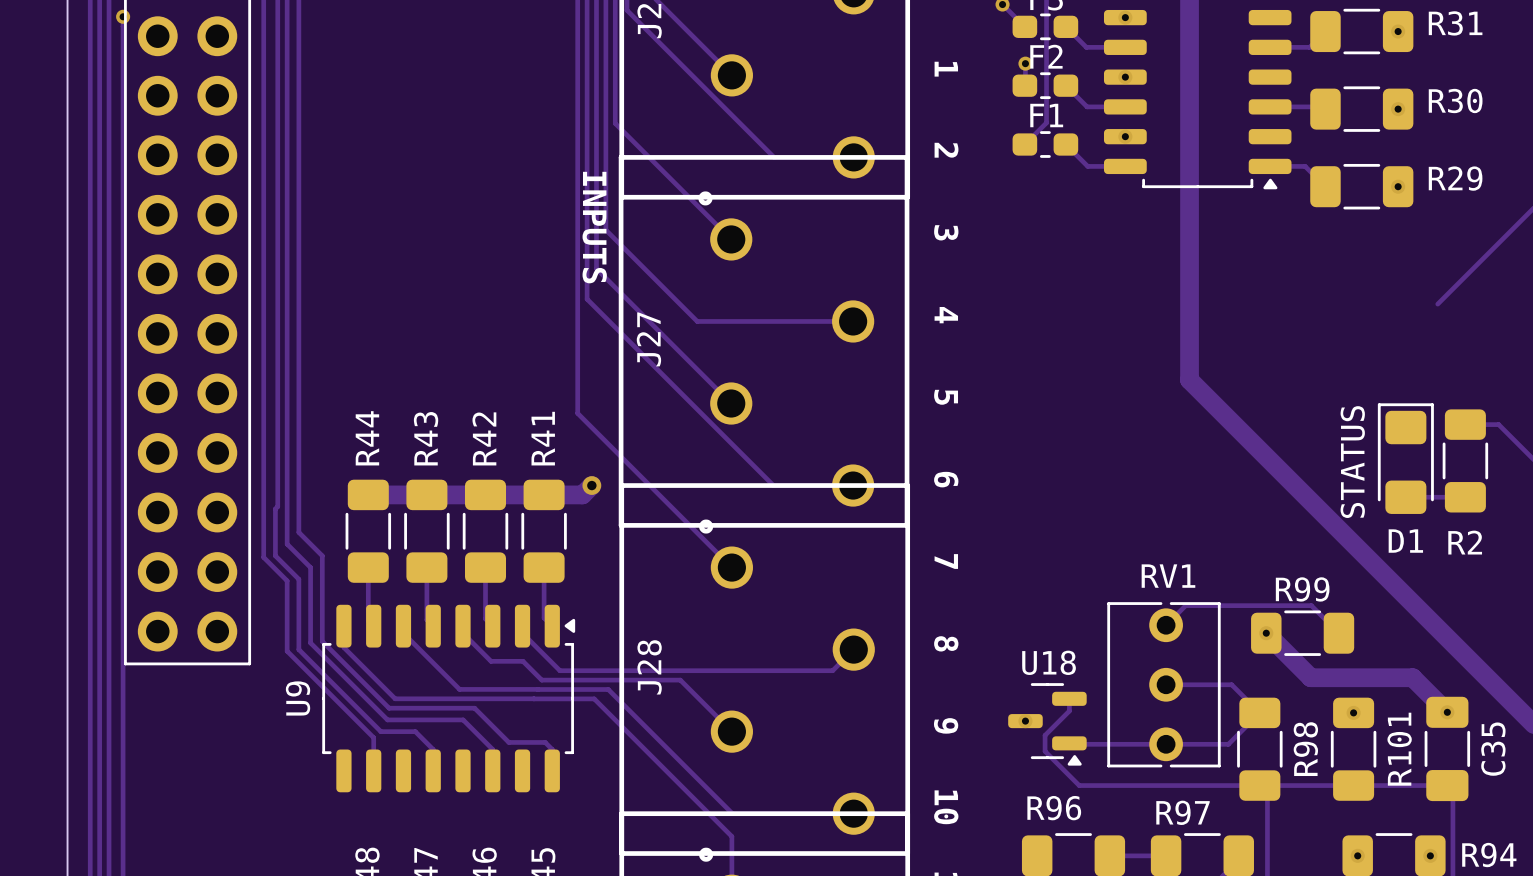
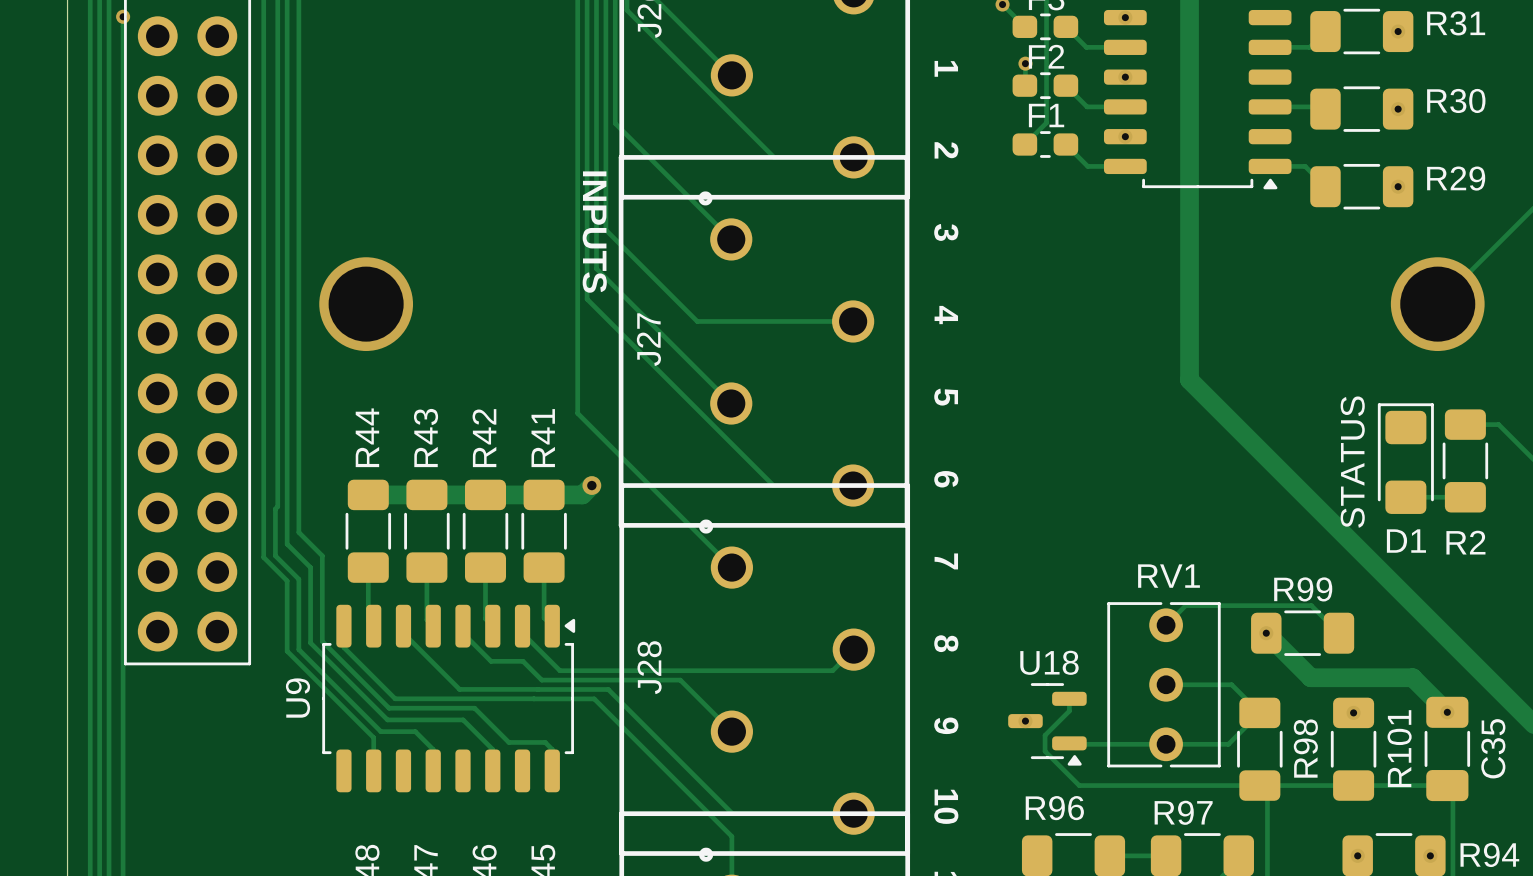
via: none -> (366, 304)
via: none -> (1437, 304)

